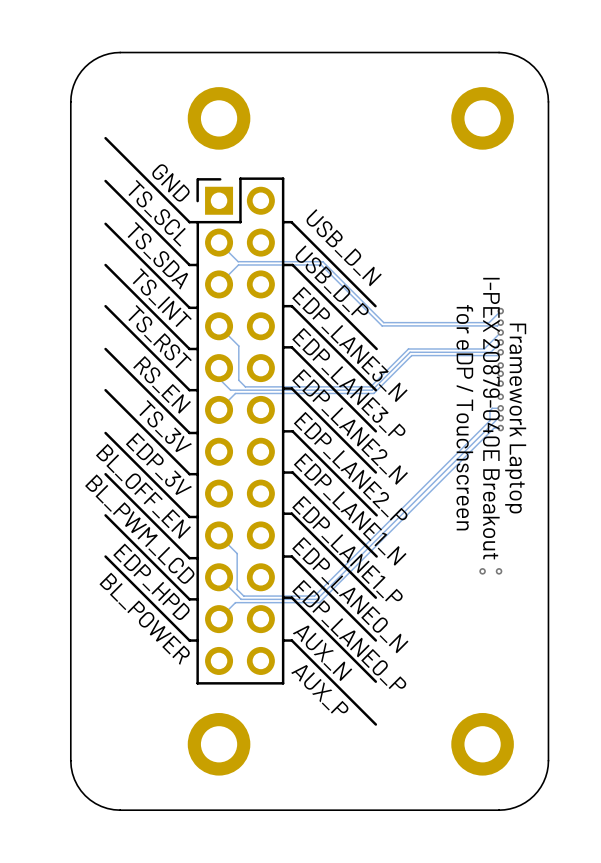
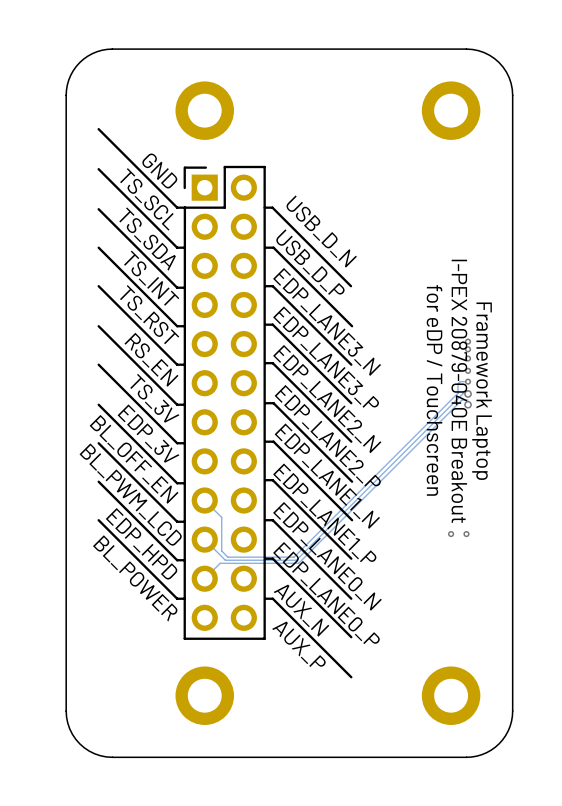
track: (219, 242) (238, 261) (322, 261) (383, 322) (489, 322) (500, 311) -> none
track: (219, 284) (238, 264) (321, 264) (382, 325) (497, 325) (500, 322) -> none
via: (500, 311) -> none
via: (500, 322) -> none
track: (219, 326) (238, 346) (238, 380) (245, 386) (370, 386) (408, 348) (484, 348) (500, 332) -> none
via: (500, 332) -> none
track: (500, 342) (490, 352) (410, 352) (372, 390) (230, 390) (219, 378) (219, 368) -> none
via: (500, 342) -> none
track: (500, 352) (497, 355) (411, 355) (373, 393) (235, 393) (219, 409) -> none
via: (500, 352) -> none
via: (500, 418) -> none
via: none -> (468, 393)
via: (500, 428) -> none
via: none -> (468, 404)

